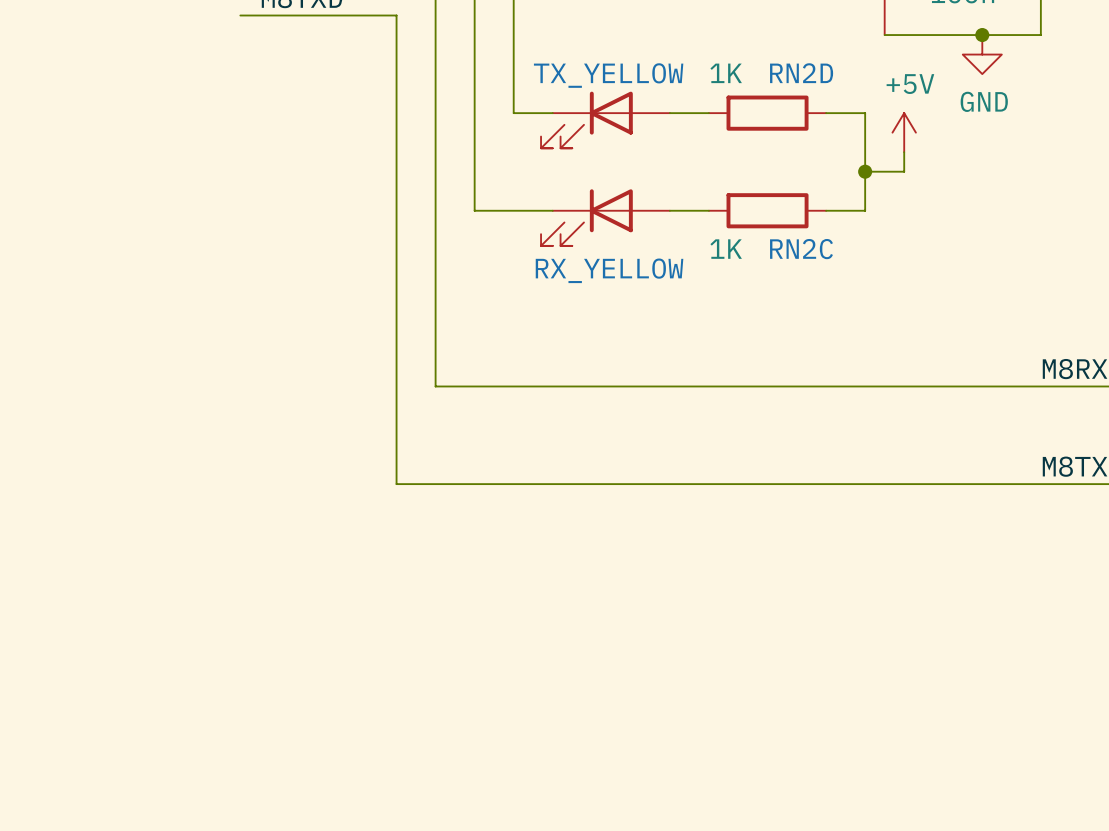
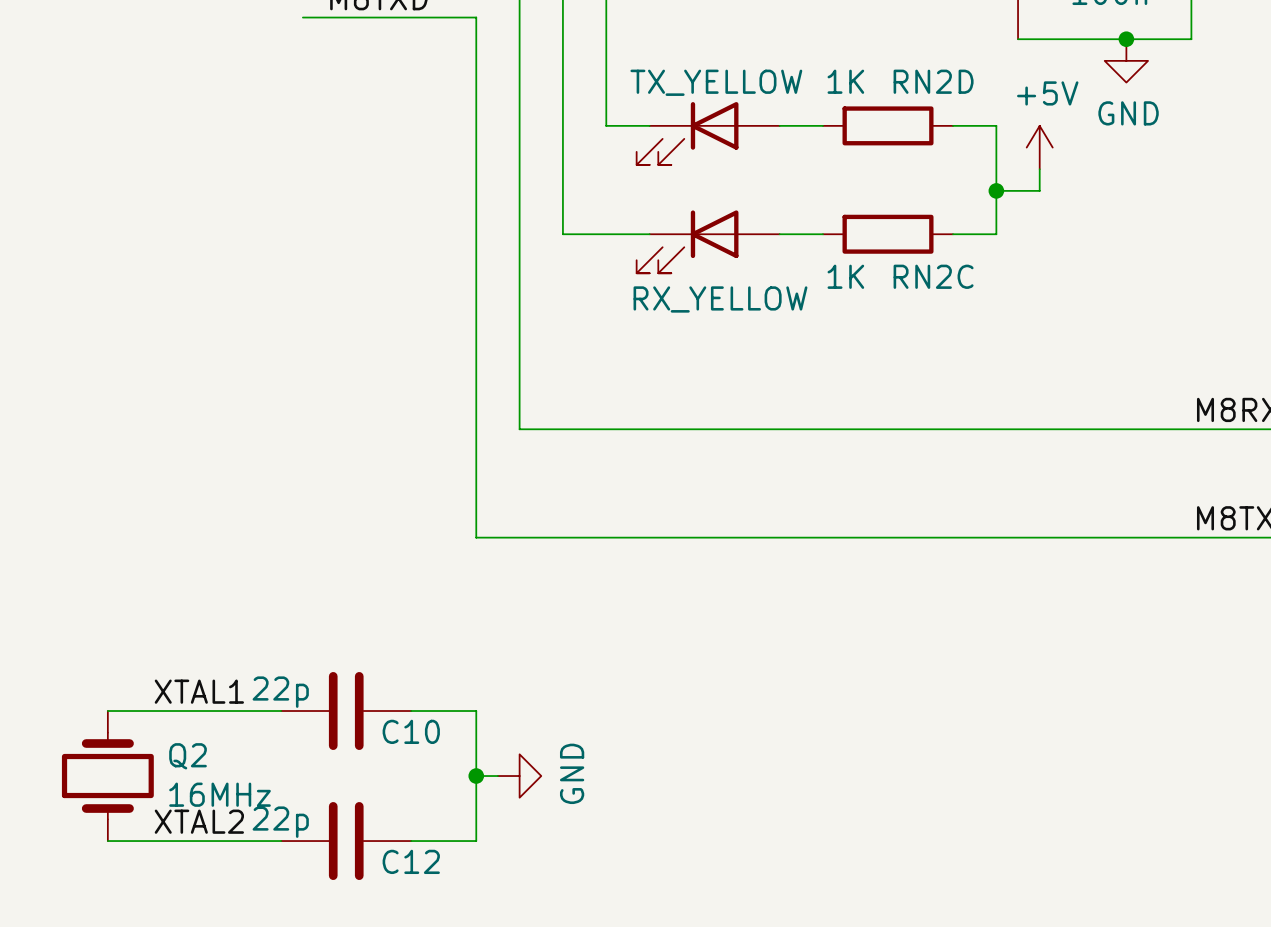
label: none -> XTAL1 (199, 691)
wire: none -> (107, 711) (281, 711)
C10: none -> 22p (346, 711)
wire: none -> (411, 711) (476, 711) (476, 841) (411, 841)
Q2: none -> 16MHz (107, 776)
wire: none -> (476, 776) (497, 776)
junction: none -> (476, 776)
power symbol: none -> GND (519, 776)
label: none -> XTAL2 (199, 821)
wire: none -> (107, 841) (281, 841)
C12: none -> 22p (346, 841)

